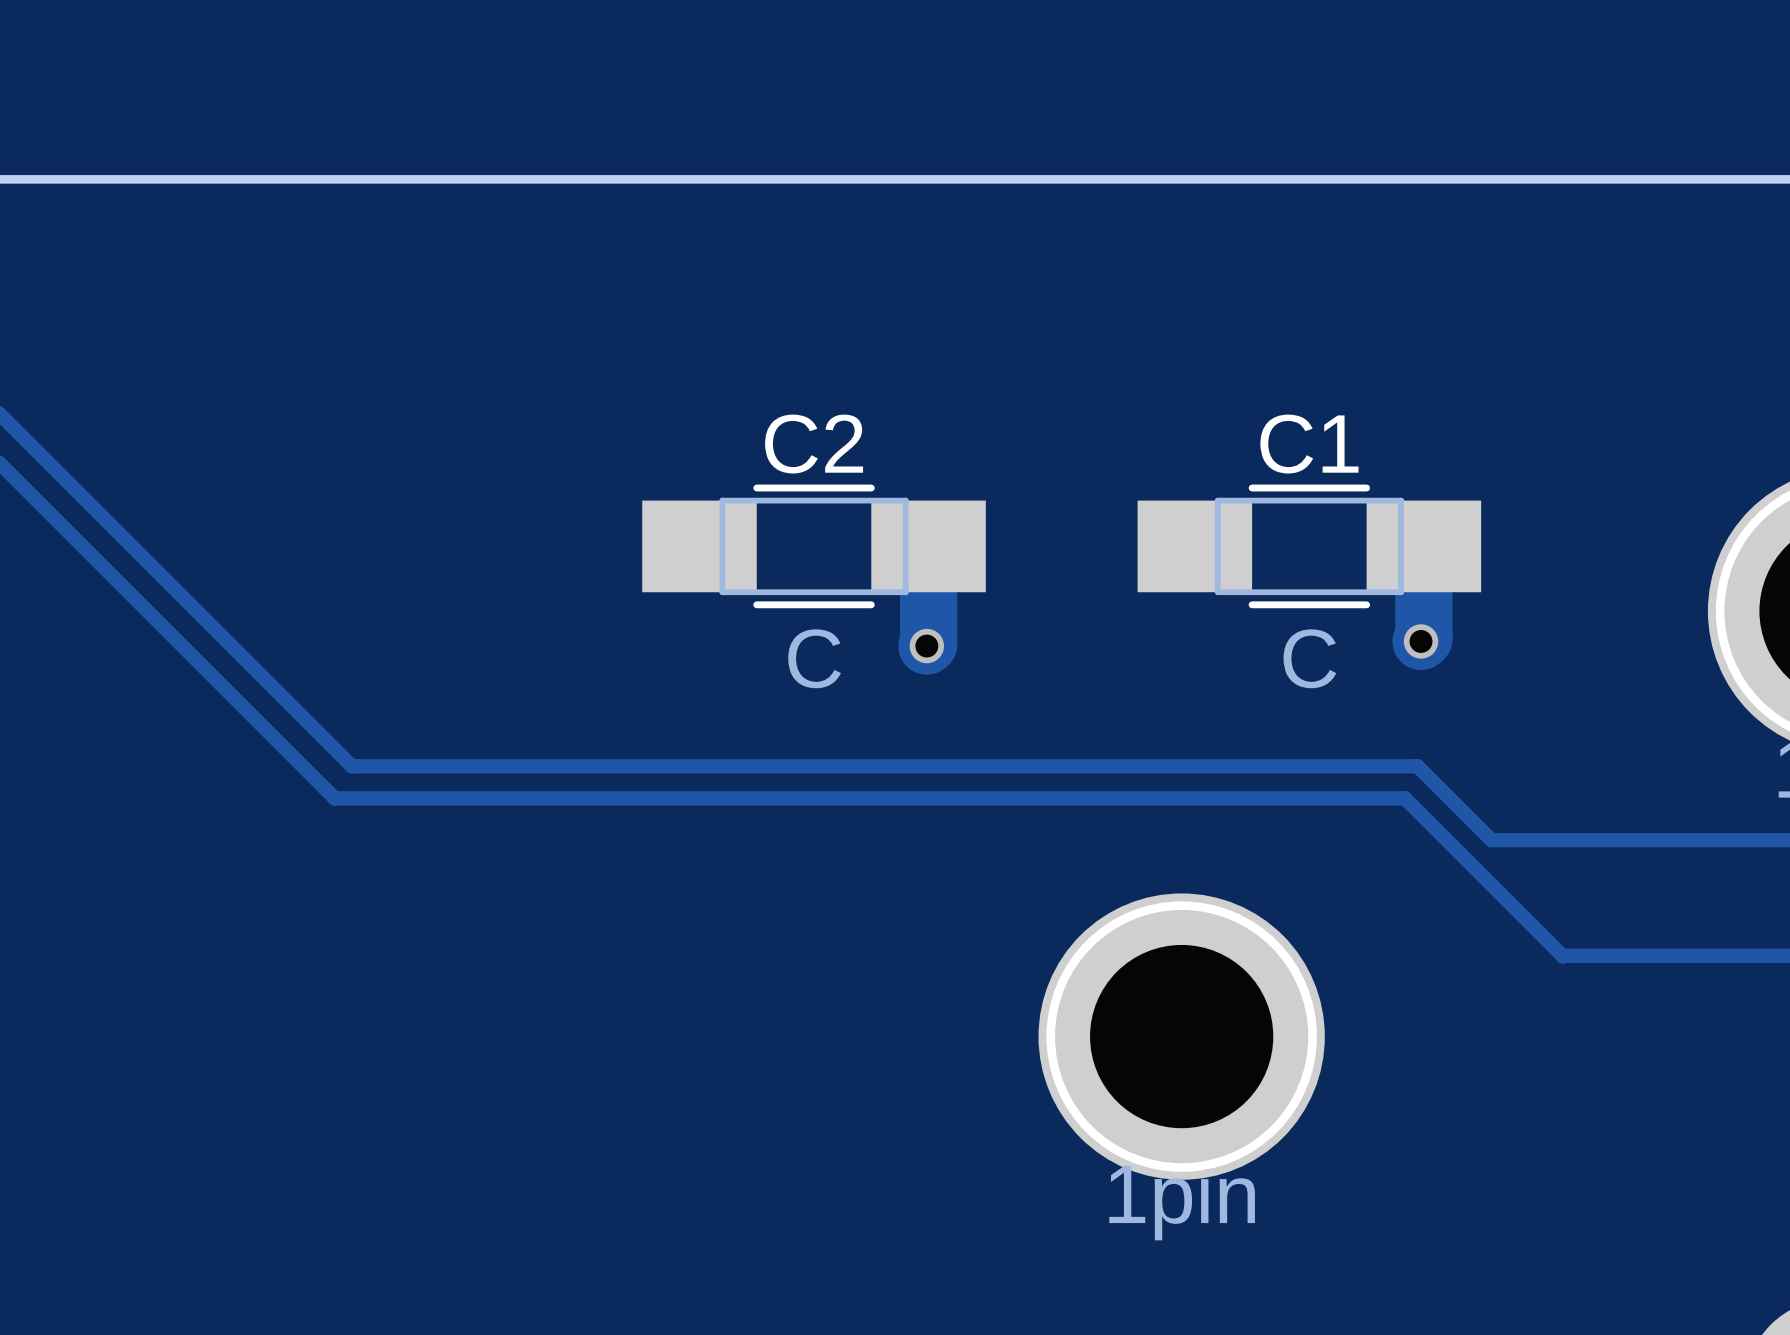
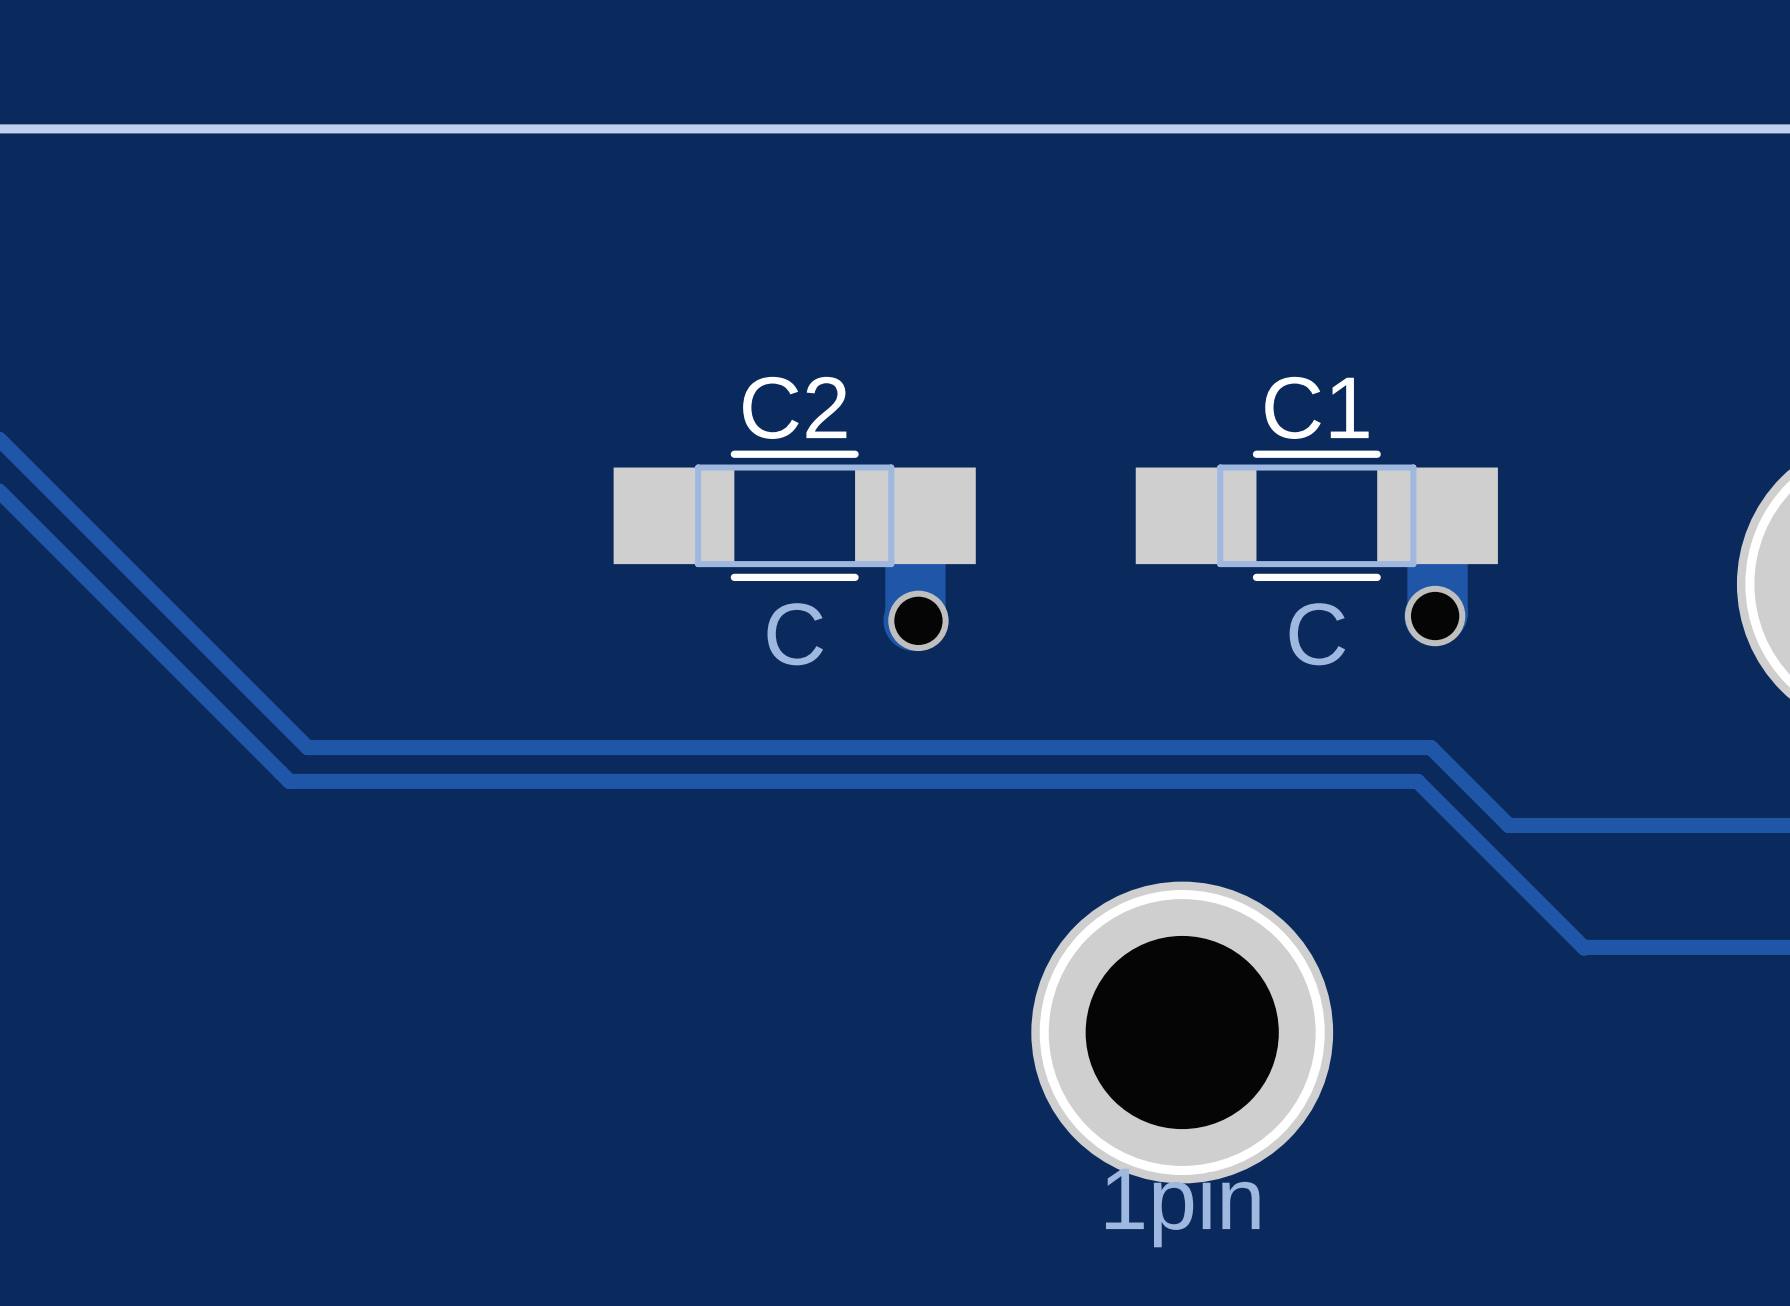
via size: [1403, 624, 1439, 659] -> [1404, 585, 1466, 647]
via size: [909, 628, 945, 664] -> [888, 590, 949, 652]

